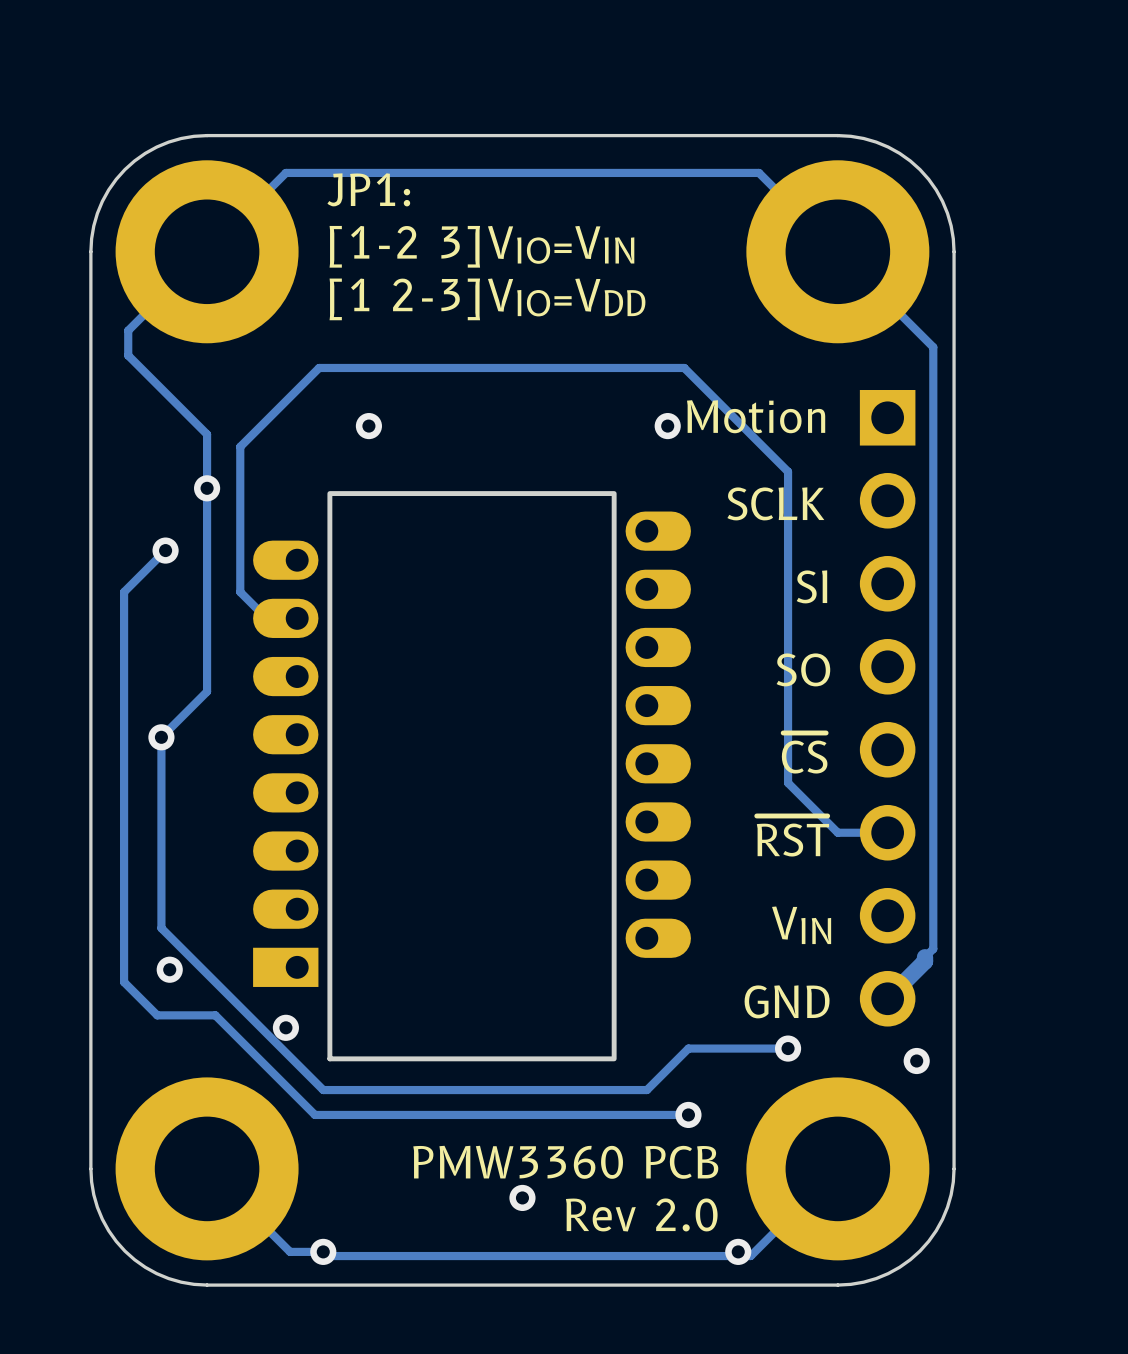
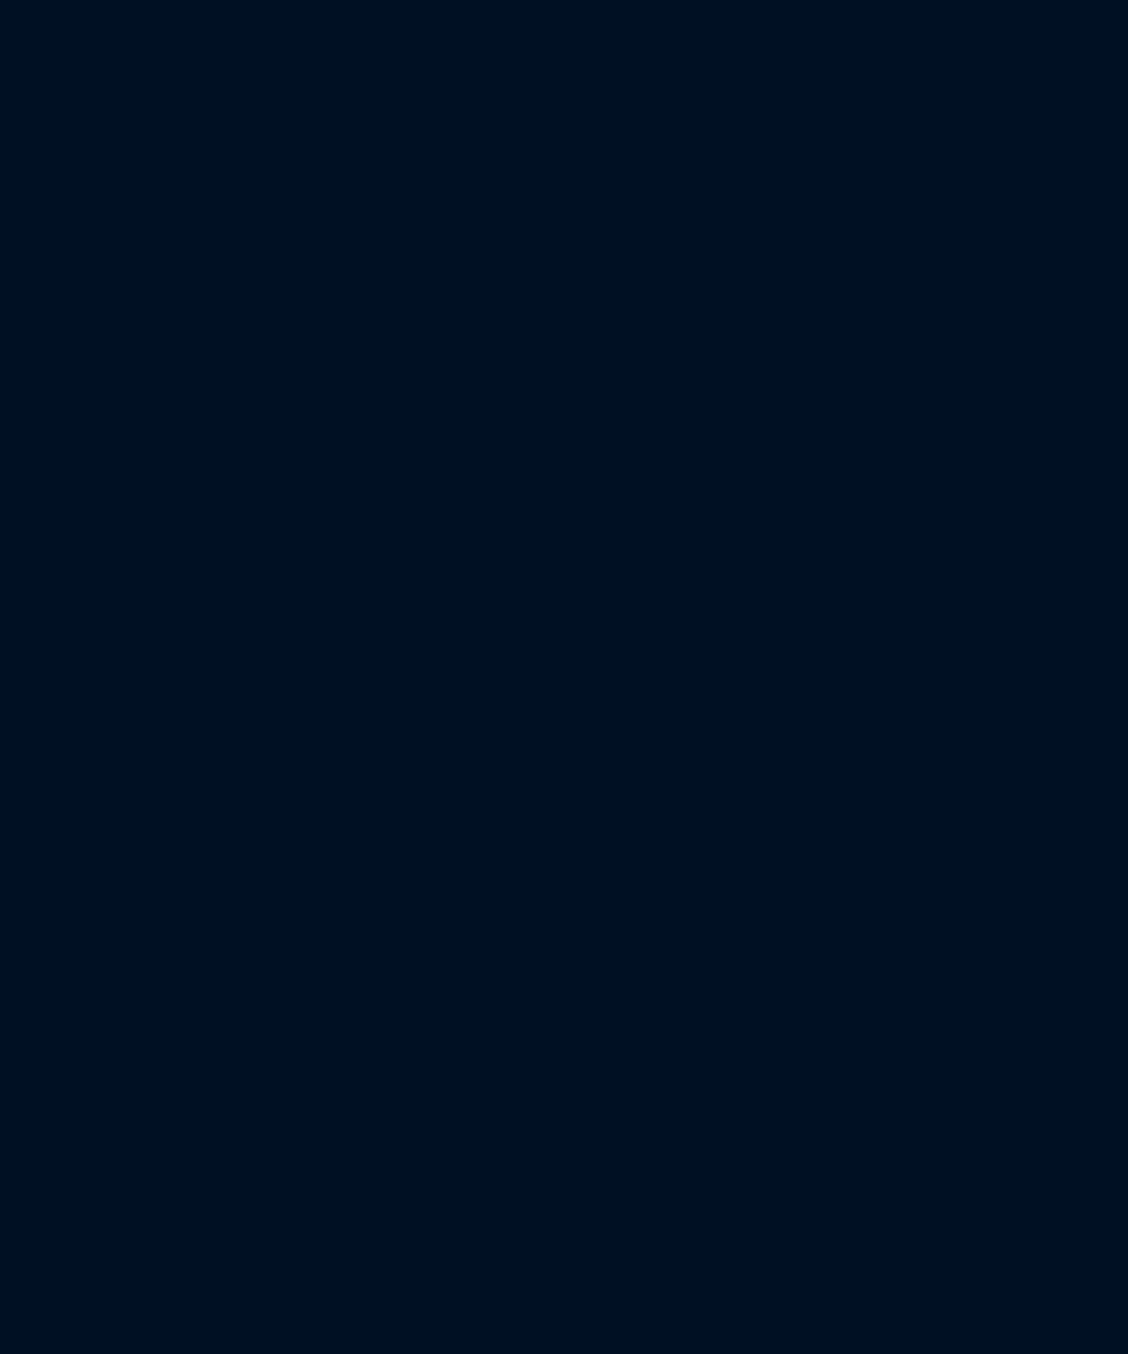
board edge: (837, 135) (194, 136) (168, 142) (145, 153) (124, 169) (108, 189) (93, 225) (90, 251) (90, 1168) (97, 1207) (108, 1230) (124, 1251) (145, 1267) (181, 1282) (207, 1285) (837, 1285) (863, 1282) (888, 1273) (910, 1259) (936, 1230) (947, 1207) (954, 1168) (953, 238) (942, 201) (928, 179) (910, 160) (876, 142) (837, 135) -> none
text: JP1: (368, 189) -> none
text: [1-2 3]VIO=VIN (481, 246) -> none
part: (207, 251) -> none
part: (837, 251) -> none
text: [1 2-3]VIO=VDD (487, 299) -> none
text: Motion (756, 416) -> none
via: (368, 426) -> none
via: (667, 426) -> none
via: (207, 488) -> none
text: SCLK (775, 503) -> none
track: (165, 550) (124, 592) (124, 982) (157, 1015) (215, 1015) (314, 1114) (688, 1114) -> none
via: (165, 550) -> none
text: SI (811, 586) -> none
track: (297, 618) (266, 618) (240, 592) (240, 446) (319, 367) (684, 367) (788, 471) (788, 782) (837, 832) (887, 832) -> none
text: SO (803, 669) -> none
part: (887, 708) -> none
via: (161, 737) -> none
text: ~{CS} (804, 753) -> none
part: (472, 776) -> none
text: ~{RST} (792, 836) -> none
text: VIN (801, 925) -> none
via: (169, 969) -> none
track: (887, 998) (925, 961) (925, 957) (933, 948) (933, 347) (759, 172) (285, 172) (128, 330) (128, 355) (207, 434) (207, 691) (161, 737) (161, 928) (323, 1090) (646, 1090) (688, 1048) (788, 1048) -> none
text: GND (787, 1001) -> none
via: (285, 1027) -> none
via: (788, 1048) -> none
via: (916, 1061) -> none
via: (688, 1114) -> none
text: PMW3360 PCB (565, 1162) -> none
part: (207, 1168) -> none
track: (837, 1168) (750, 1256) (327, 1256) (323, 1251) (290, 1251) (215, 1177) (215, 1168) -> none
part: (837, 1168) -> none
via: (522, 1197) -> none
text: Rev 2.0 (641, 1214) -> none
via: (323, 1251) -> none
via: (738, 1251) -> none

